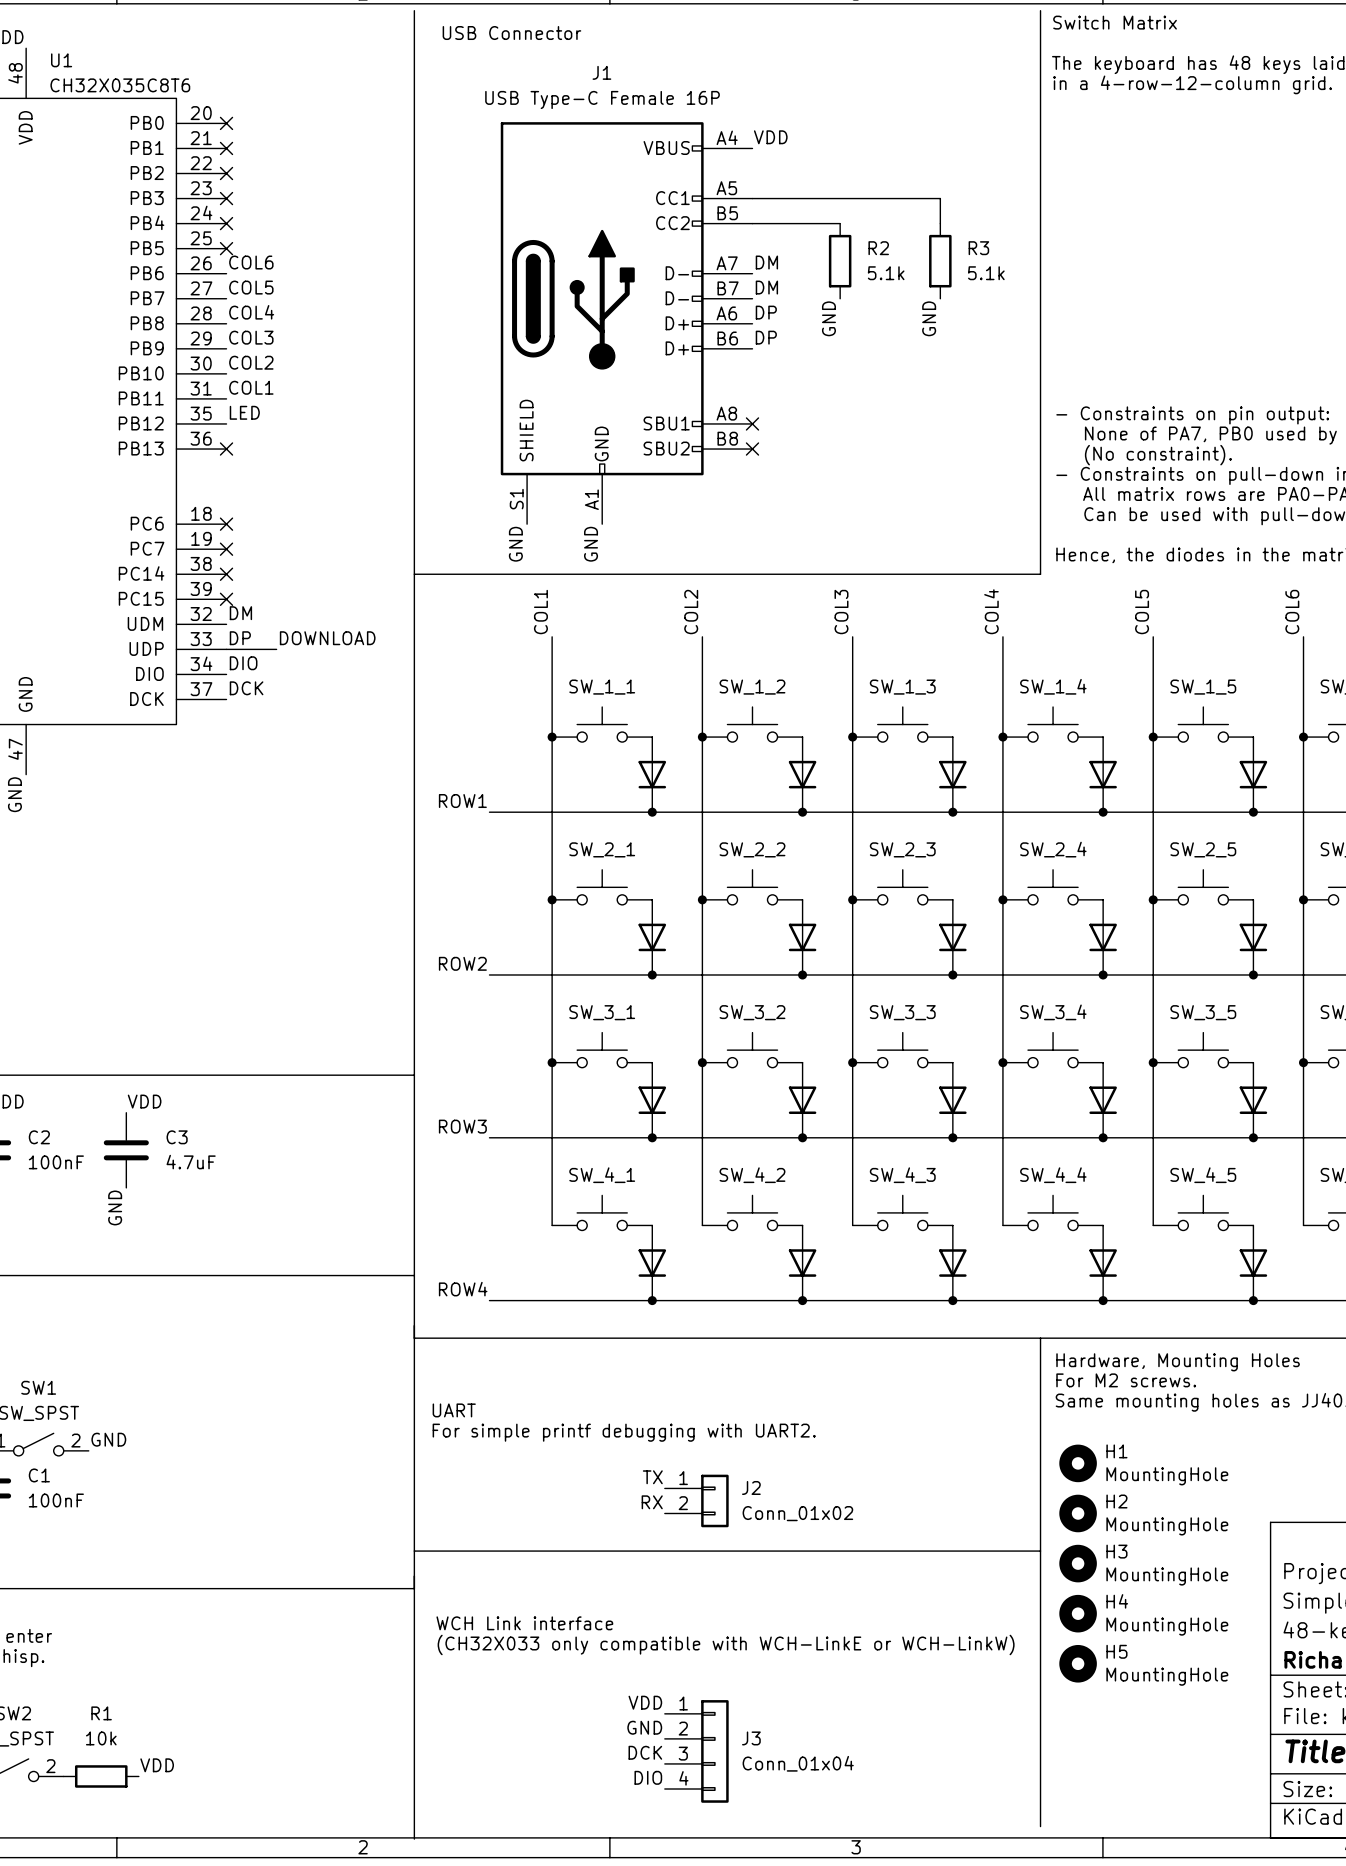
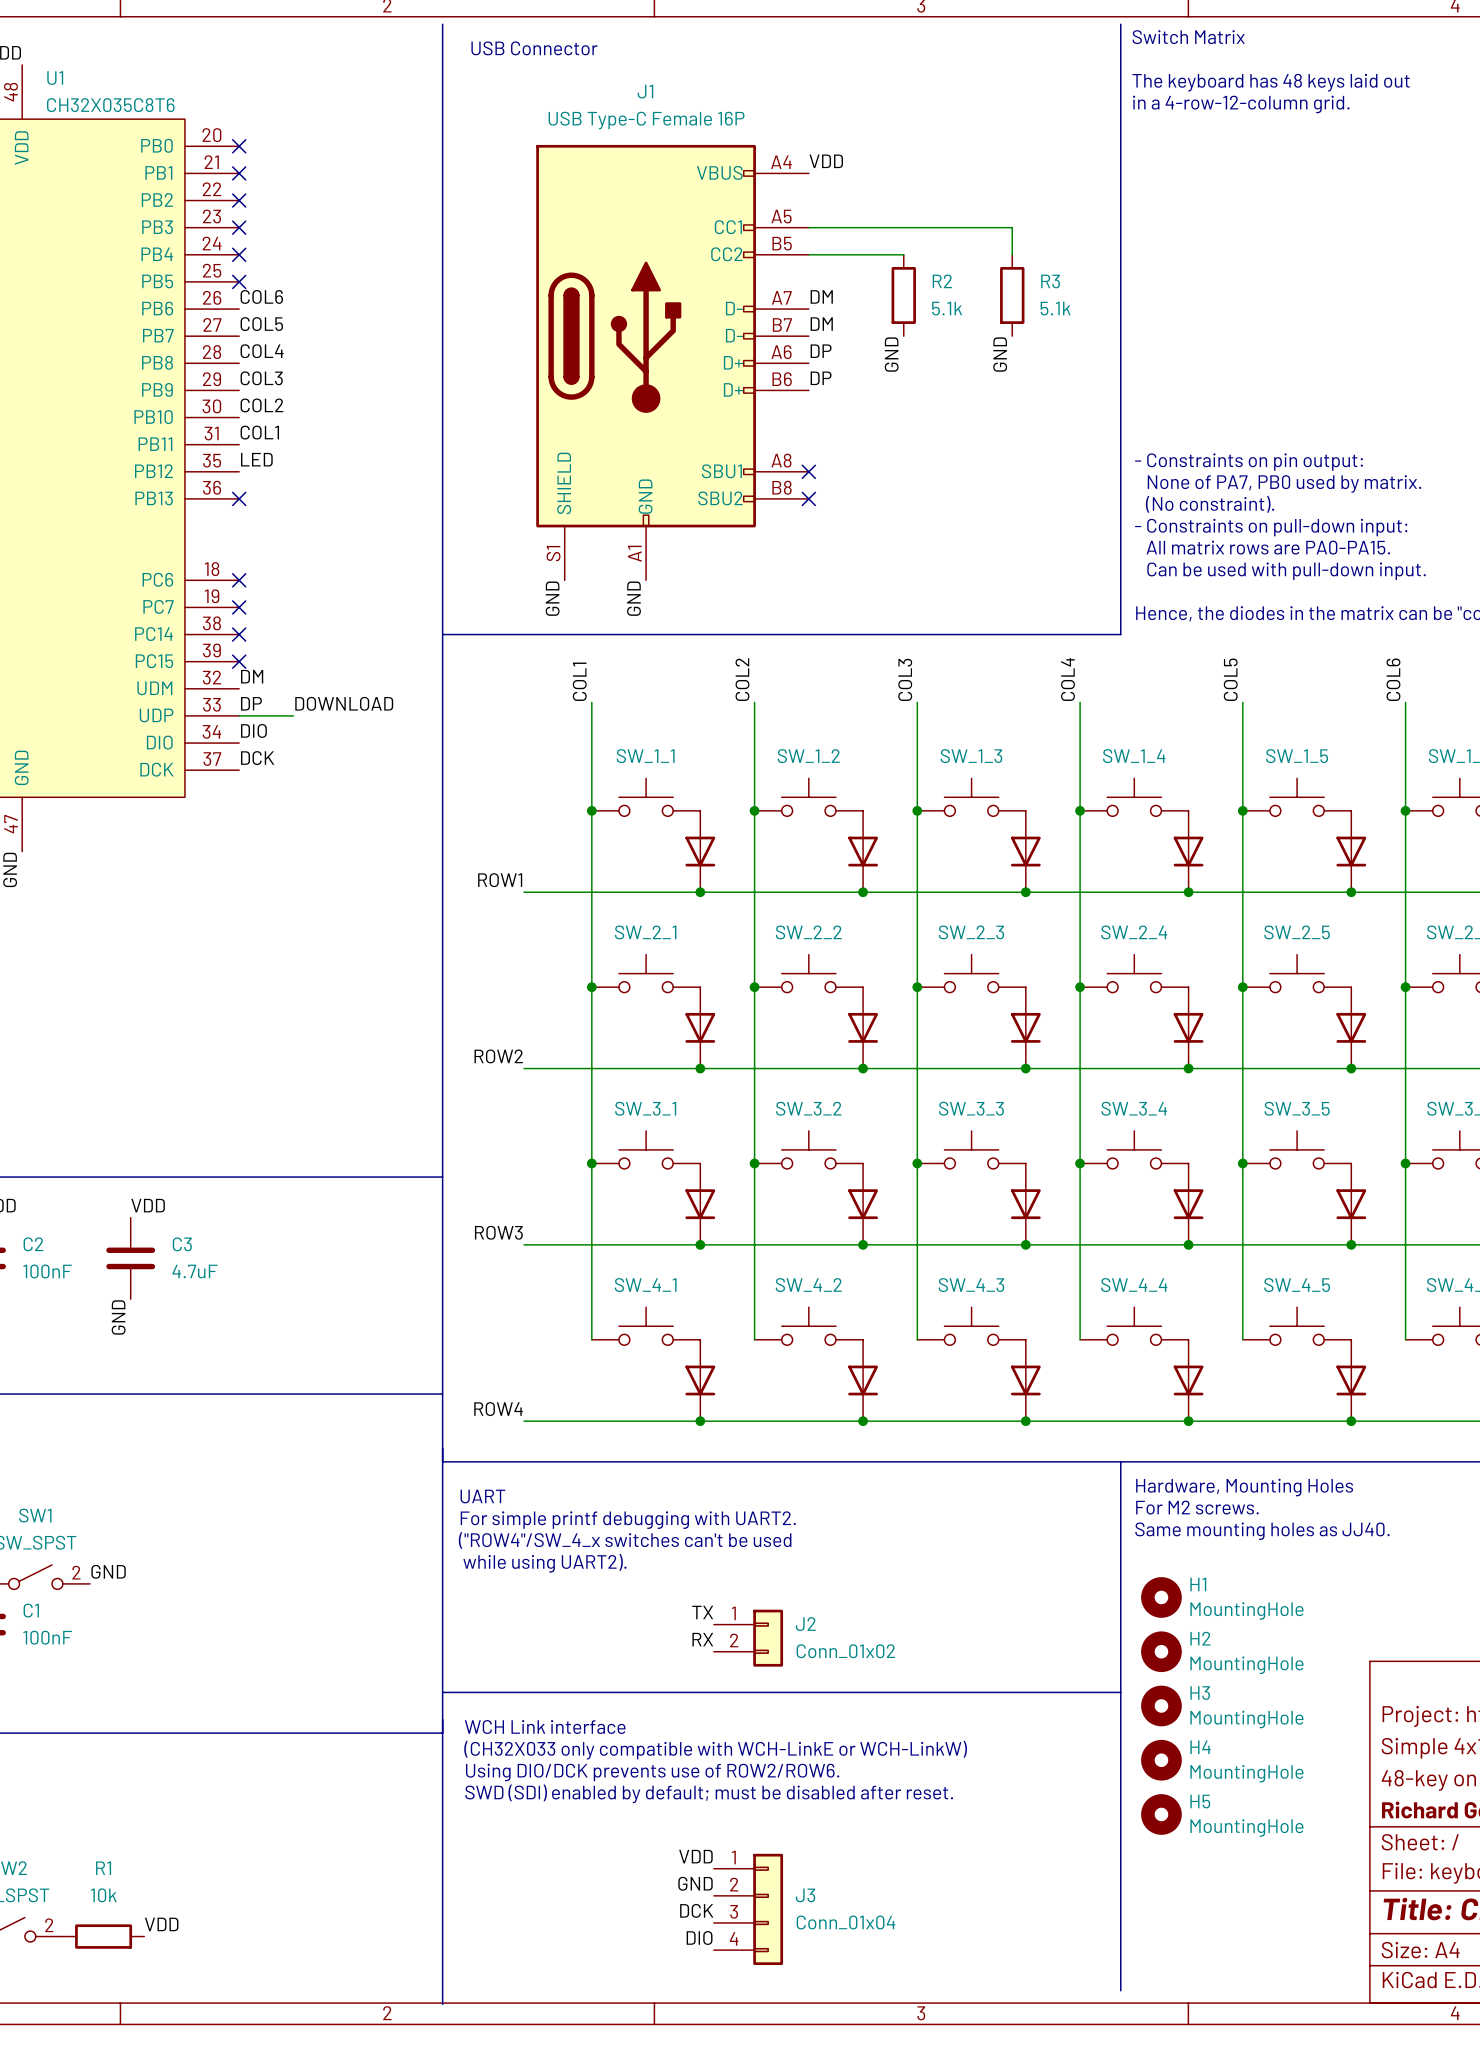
text: none -> UART (482, 1496)
text: none -> For simple printf debugging with UART2. (628, 1520)
text: UART (454, 1410) -> ("ROW4"/SW_4_x switches can't be used (625, 1540)
text: For simple printf debugging with UART2. (624, 1432) -> while using UART2). (544, 1563)
text: none -> WCH Link interface (545, 1727)
text: none -> (CH32X033 only compatible with WCH-LinkE or WCH-LinkW) (715, 1750)
text: WCH Link interface (524, 1623) -> Using DIO/DCK prevents use of ROW2/ROW6. (652, 1772)
text: (CH32X033 only compatible with WCH-LinkE or WCH-LinkW) (726, 1644) -> SWD (SDI) enabled by default; must be disabled after reset. (709, 1793)

